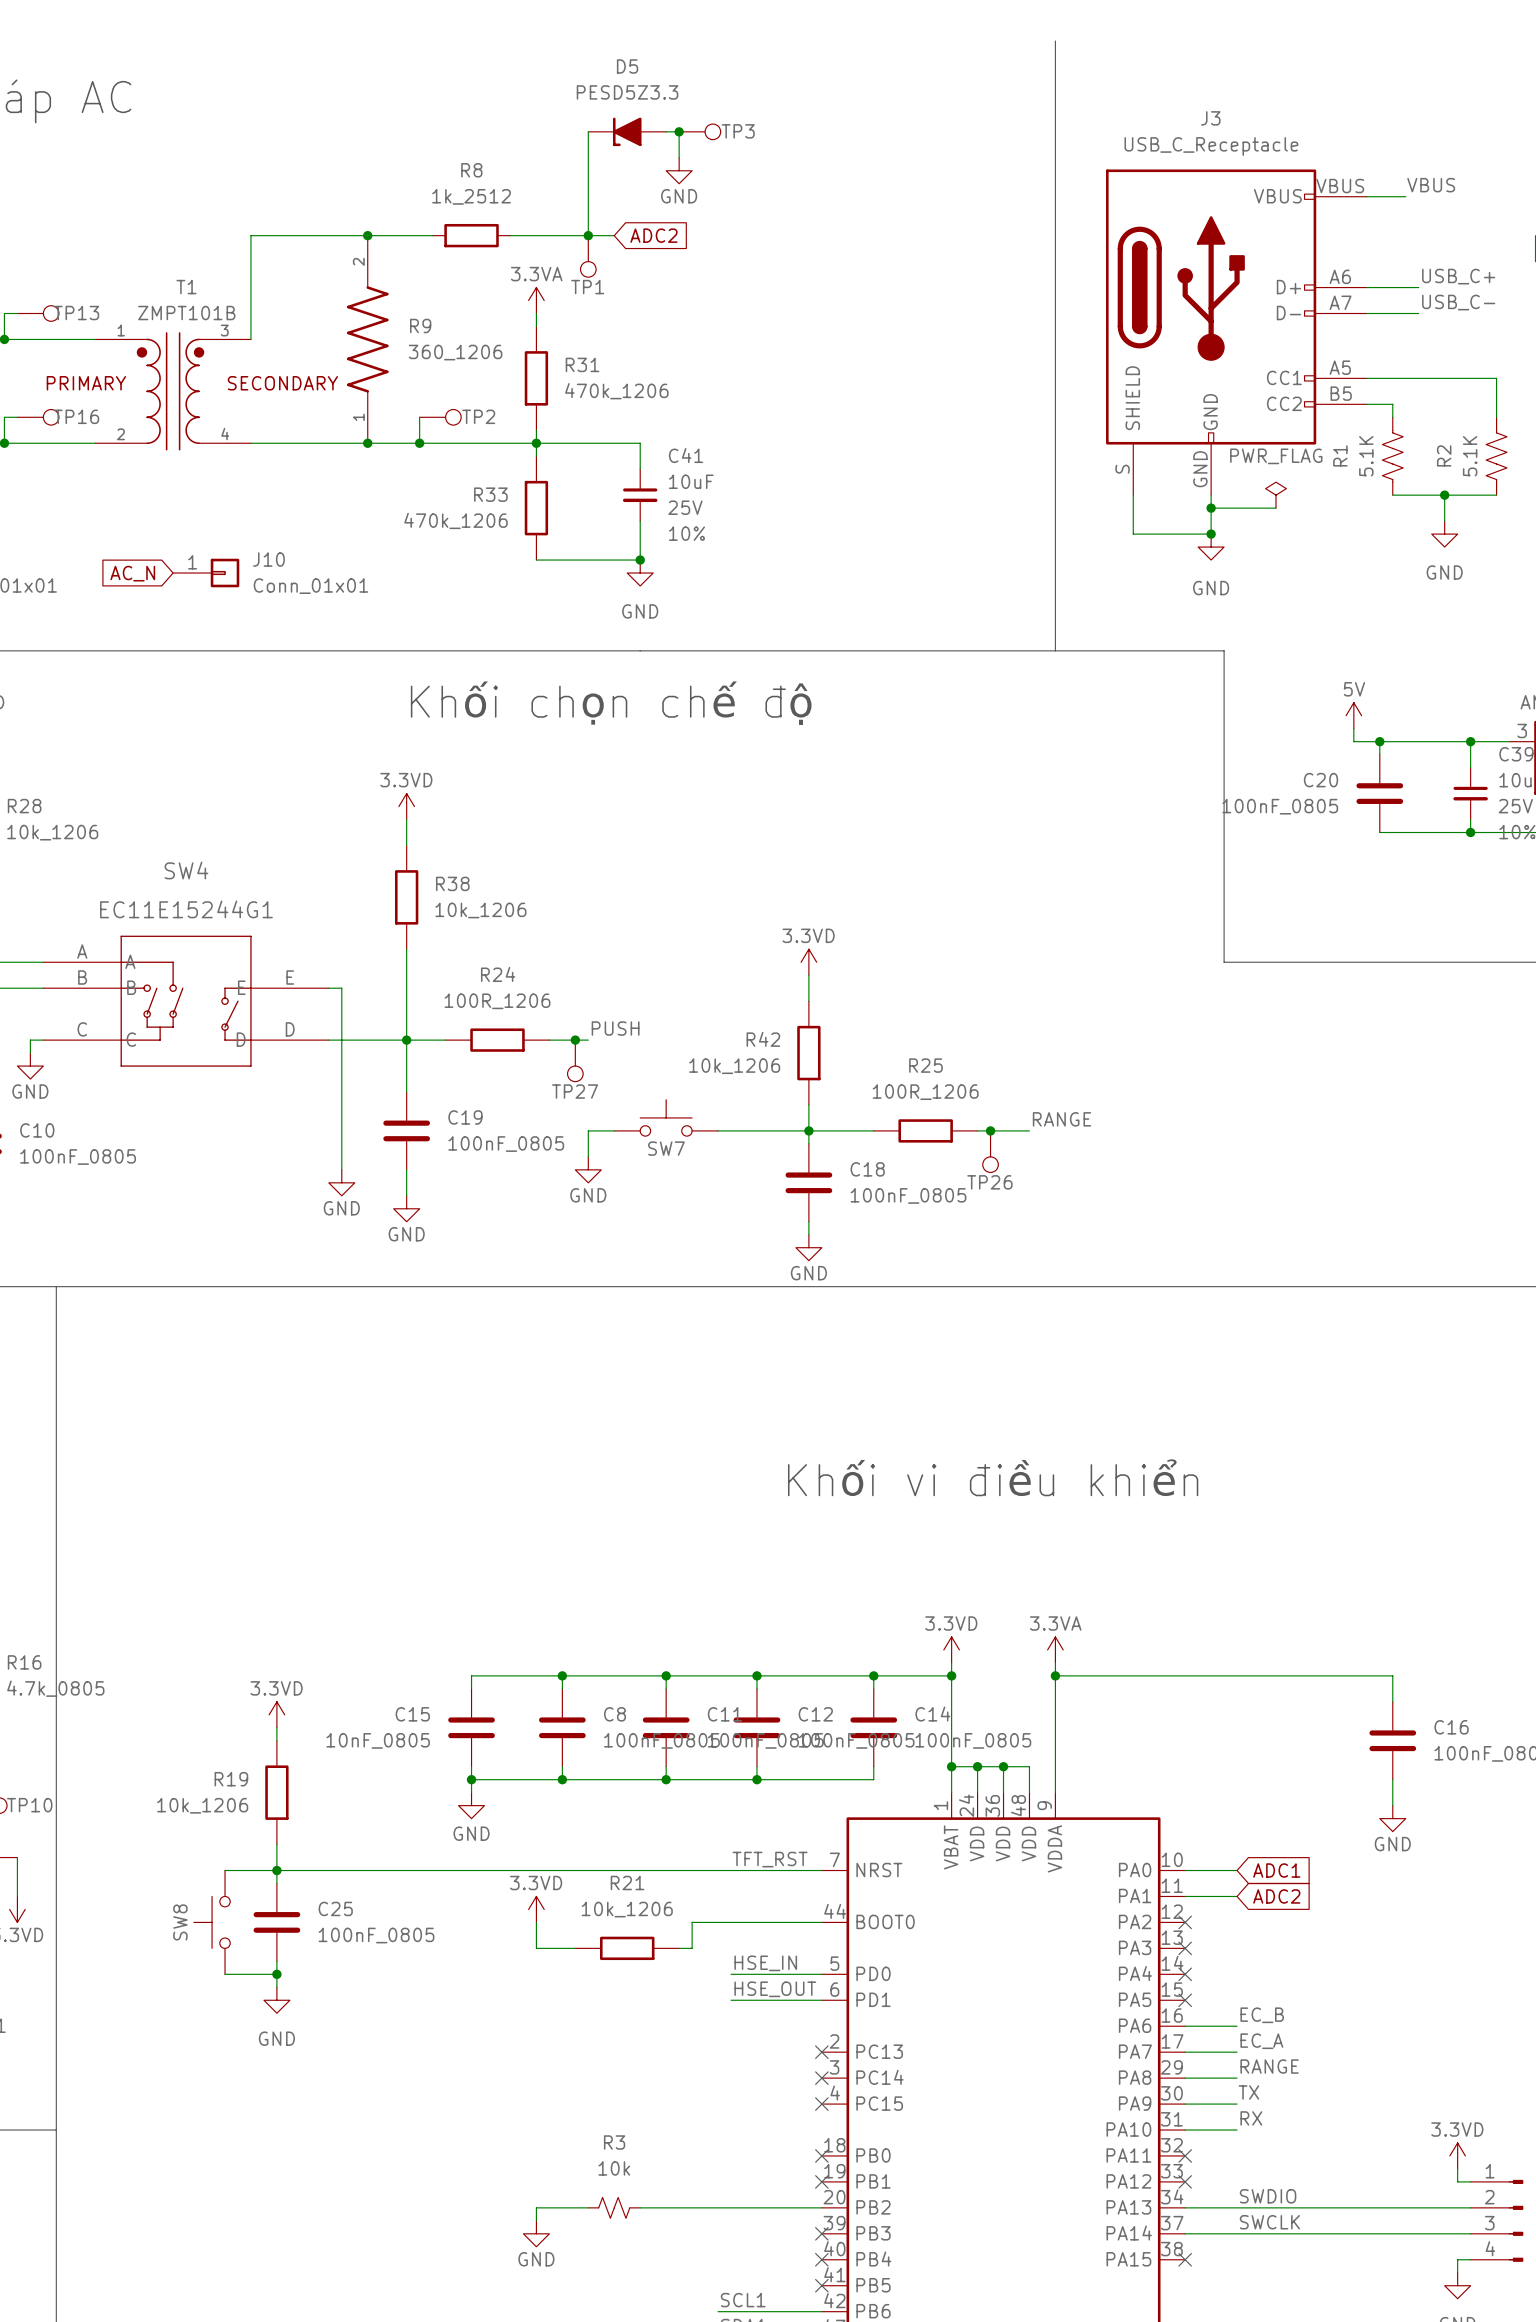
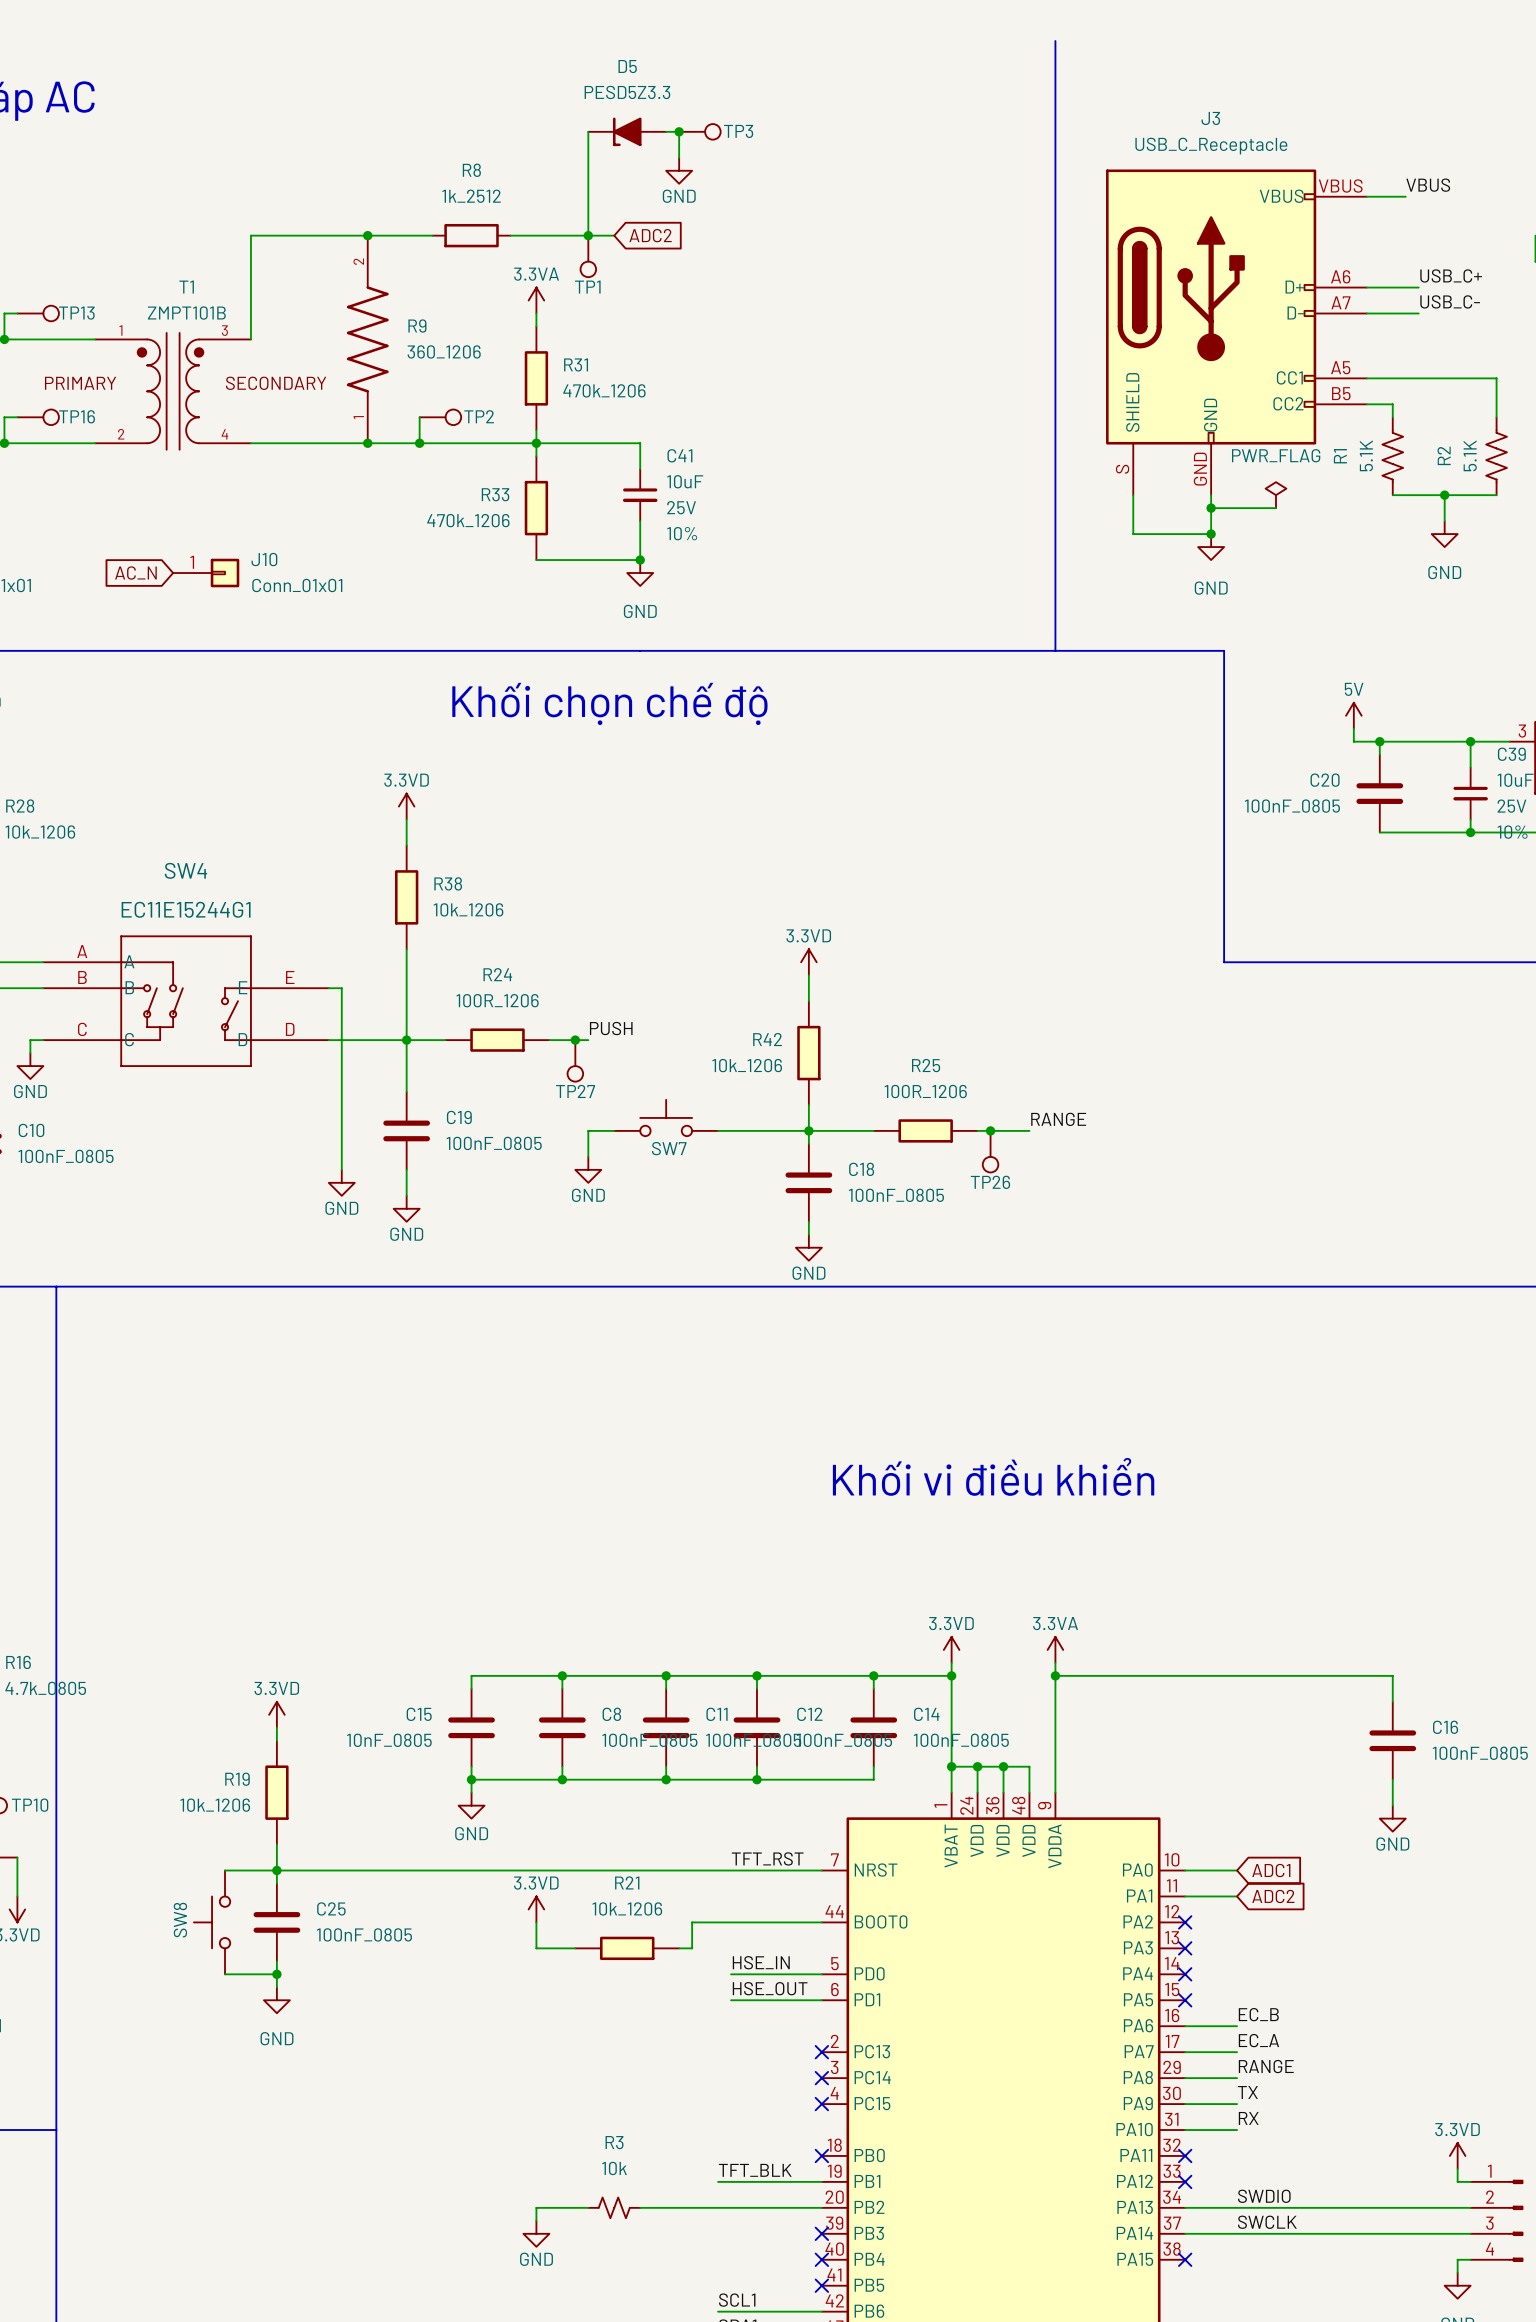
label: none -> TFT_BLK (755, 2170)
wire: none -> (718, 2181) (821, 2181)
no-connect mark: (821, 2181) -> none

